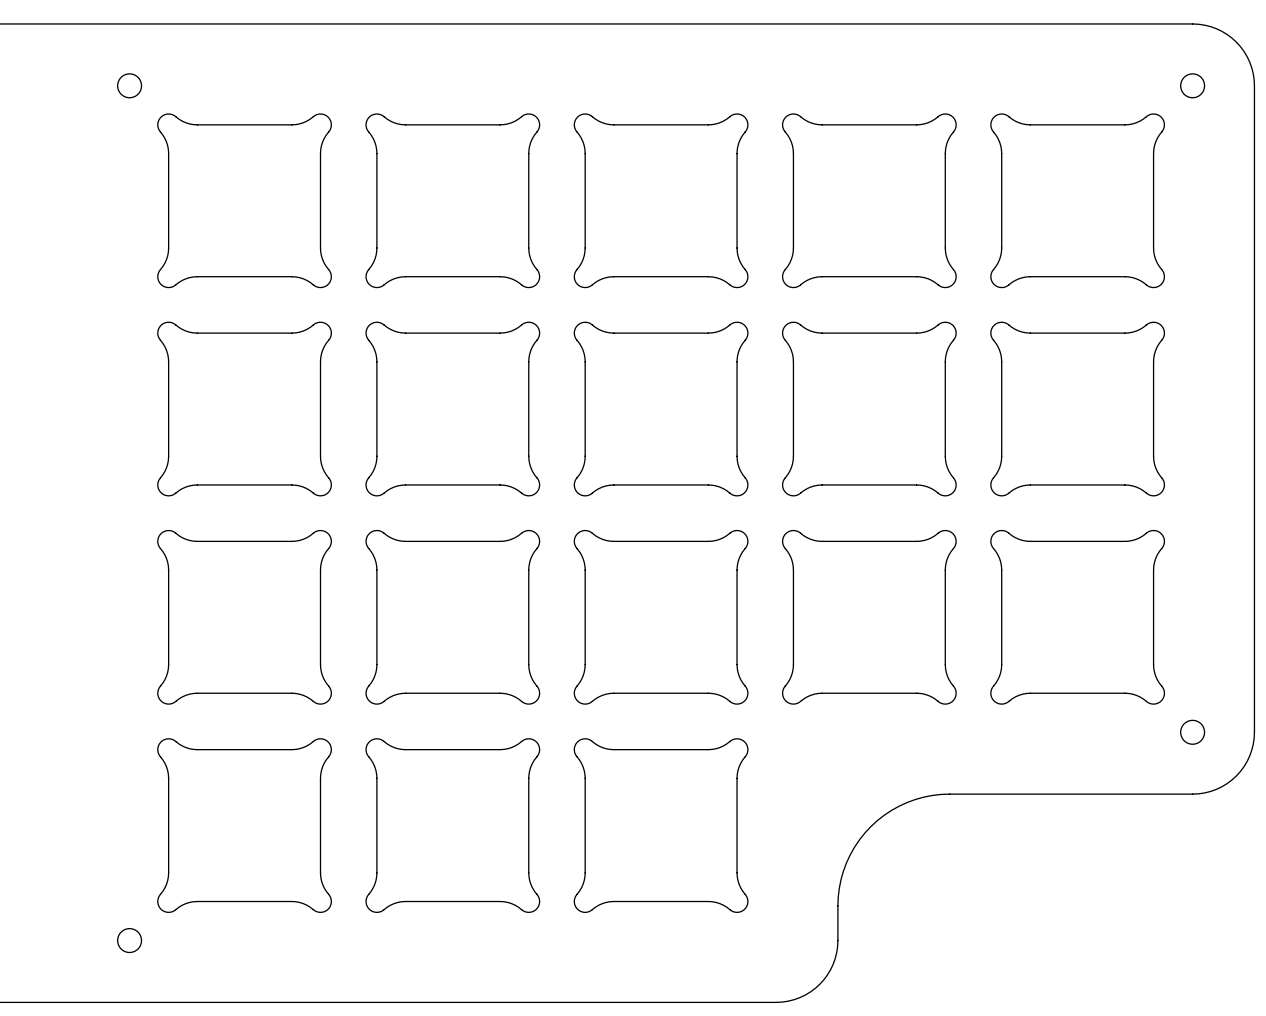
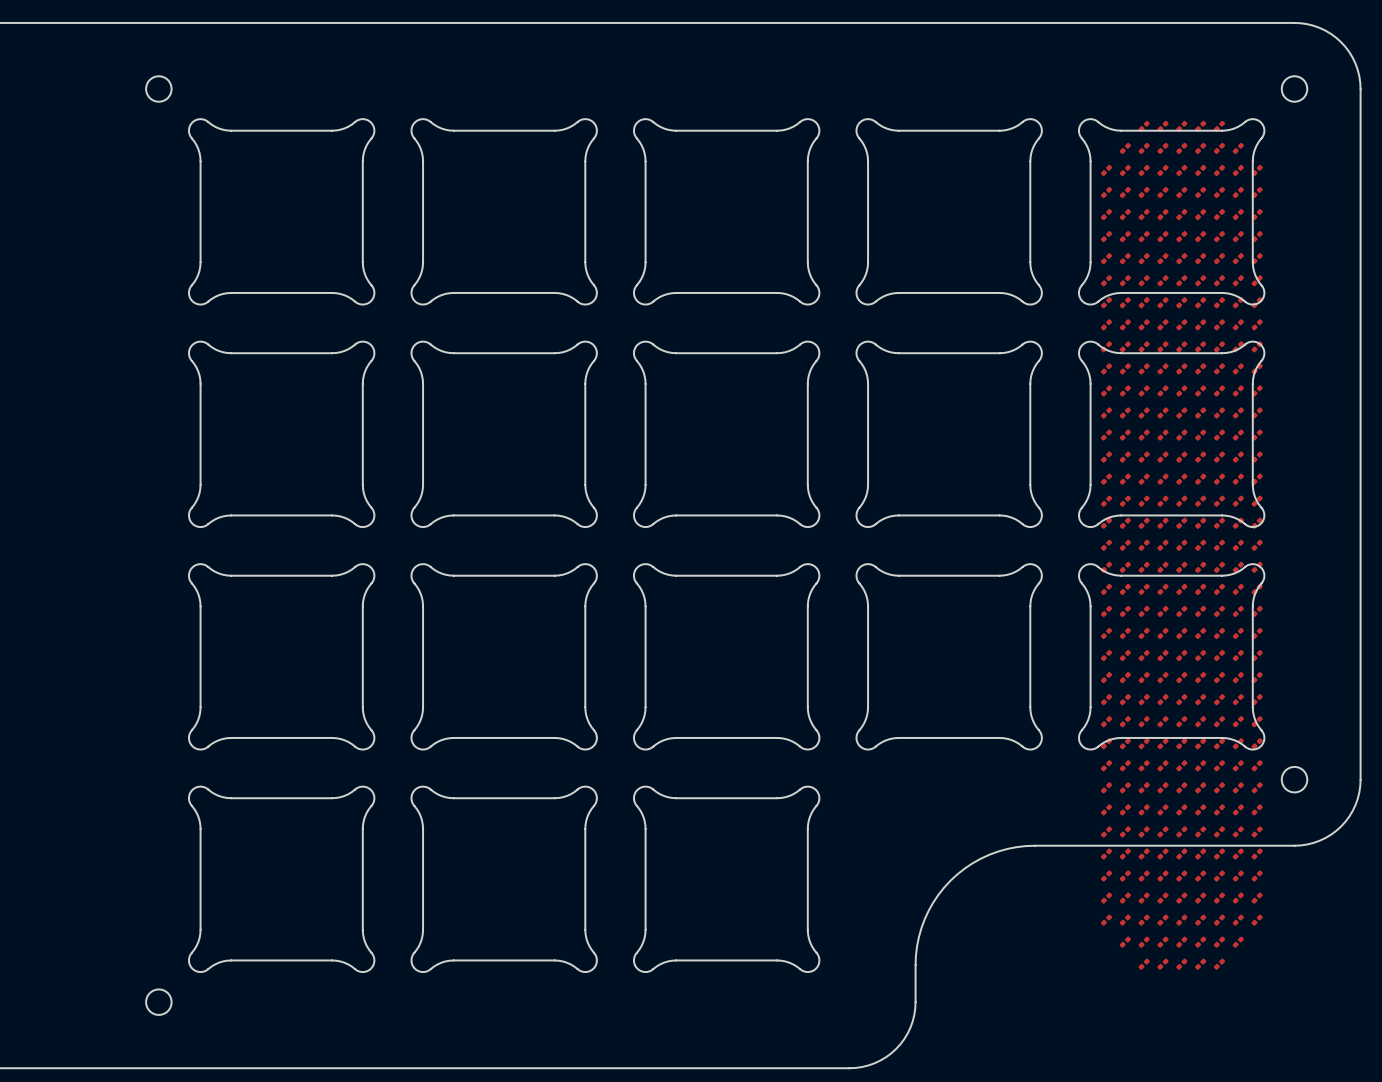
part: none -> (1144, 126)
part: none -> (1162, 126)
part: none -> (1181, 126)
part: none -> (1200, 126)
part: none -> (1219, 126)
part: none -> (1125, 148)
part: none -> (1144, 148)
part: none -> (1162, 148)
part: none -> (1181, 148)
part: none -> (1200, 148)
part: none -> (1219, 148)
part: none -> (1238, 148)
part: none -> (1106, 170)
part: none -> (1125, 170)
part: none -> (1144, 170)
part: none -> (1162, 170)
part: none -> (1181, 170)
part: none -> (1200, 170)
part: none -> (1219, 170)
part: none -> (1238, 170)
part: none -> (1257, 170)
part: none -> (1106, 192)
part: none -> (1125, 192)
part: none -> (1144, 192)
part: none -> (1162, 192)
part: none -> (1181, 192)
part: none -> (1200, 192)
part: none -> (1219, 192)
part: none -> (1238, 192)
part: none -> (1257, 192)
part: none -> (1106, 214)
part: none -> (1125, 214)
part: none -> (1144, 214)
part: none -> (1162, 214)
part: none -> (1181, 214)
part: none -> (1200, 214)
part: none -> (1219, 214)
part: none -> (1238, 214)
part: none -> (1257, 214)
part: none -> (1106, 236)
part: none -> (1125, 236)
part: none -> (1144, 236)
part: none -> (1162, 236)
part: none -> (1181, 236)
part: none -> (1200, 236)
part: none -> (1219, 236)
part: none -> (1238, 236)
part: none -> (1257, 236)
part: none -> (1106, 258)
part: none -> (1125, 258)
part: none -> (1144, 258)
part: none -> (1162, 258)
part: none -> (1181, 258)
part: none -> (1200, 258)
part: none -> (1219, 258)
part: none -> (1238, 258)
part: none -> (1257, 258)
part: none -> (1106, 280)
part: none -> (1125, 280)
part: none -> (1144, 280)
part: none -> (1162, 280)
part: none -> (1181, 280)
part: none -> (1200, 280)
part: none -> (1219, 280)
part: none -> (1238, 280)
part: none -> (1257, 280)
part: none -> (1106, 302)
part: none -> (1125, 302)
part: none -> (1144, 302)
part: none -> (1162, 302)
part: none -> (1181, 302)
part: none -> (1200, 302)
part: none -> (1219, 302)
part: none -> (1238, 302)
part: none -> (1257, 302)
part: none -> (1106, 324)
part: none -> (1125, 324)
part: none -> (1144, 324)
part: none -> (1162, 324)
part: none -> (1181, 324)
part: none -> (1200, 324)
part: none -> (1219, 324)
part: none -> (1238, 324)
part: none -> (1257, 324)
part: none -> (1106, 346)
part: none -> (1125, 346)
part: none -> (1144, 346)
part: none -> (1162, 346)
part: none -> (1181, 346)
part: none -> (1200, 346)
part: none -> (1219, 346)
part: none -> (1238, 346)
part: none -> (1257, 346)
part: none -> (1106, 368)
part: none -> (1125, 368)
part: none -> (1144, 368)
part: none -> (1162, 368)
part: none -> (1181, 368)
part: none -> (1200, 368)
part: none -> (1219, 368)
part: none -> (1238, 368)
part: none -> (1257, 368)
part: none -> (1106, 390)
part: none -> (1125, 390)
part: none -> (1144, 390)
part: none -> (1162, 390)
part: none -> (1181, 390)
part: none -> (1200, 390)
part: none -> (1219, 390)
part: none -> (1238, 390)
part: none -> (1257, 390)
part: none -> (1106, 413)
part: none -> (1125, 413)
part: none -> (1144, 413)
part: none -> (1162, 413)
part: none -> (1181, 413)
part: none -> (1200, 413)
part: none -> (1219, 413)
part: none -> (1238, 413)
part: none -> (1257, 413)
part: none -> (1106, 435)
part: none -> (1125, 435)
part: none -> (1144, 435)
part: none -> (1162, 435)
part: none -> (1181, 435)
part: none -> (1200, 435)
part: none -> (1219, 435)
part: none -> (1238, 435)
part: none -> (1257, 435)
part: none -> (1106, 457)
part: none -> (1125, 457)
part: none -> (1144, 457)
part: none -> (1162, 457)
part: none -> (1181, 457)
part: none -> (1200, 457)
part: none -> (1219, 457)
part: none -> (1238, 457)
part: none -> (1257, 457)
part: none -> (1106, 479)
part: none -> (1125, 479)
part: none -> (1144, 479)
part: none -> (1162, 479)
part: none -> (1181, 479)
part: none -> (1200, 479)
part: none -> (1219, 479)
part: none -> (1238, 479)
part: none -> (1257, 479)
part: none -> (1106, 501)
part: none -> (1125, 501)
part: none -> (1144, 501)
part: none -> (1162, 501)
part: none -> (1181, 501)
part: none -> (1200, 501)
part: none -> (1219, 501)
part: none -> (1238, 501)
part: none -> (1257, 501)
part: none -> (1106, 523)
part: none -> (1125, 523)
part: none -> (1144, 523)
part: none -> (1162, 523)
part: none -> (1181, 523)
part: none -> (1200, 523)
part: none -> (1219, 523)
part: none -> (1238, 523)
part: none -> (1257, 523)
part: none -> (1106, 545)
part: none -> (1125, 545)
part: none -> (1144, 545)
part: none -> (1162, 545)
part: none -> (1181, 545)
part: none -> (1200, 545)
part: none -> (1219, 545)
part: none -> (1238, 545)
part: none -> (1257, 545)
part: none -> (1106, 567)
part: none -> (1125, 567)
part: none -> (1144, 567)
part: none -> (1162, 567)
part: none -> (1181, 567)
part: none -> (1200, 567)
part: none -> (1219, 567)
part: none -> (1238, 567)
part: none -> (1257, 567)
part: none -> (1106, 589)
part: none -> (1125, 589)
part: none -> (1144, 589)
part: none -> (1162, 589)
part: none -> (1181, 589)
part: none -> (1200, 589)
part: none -> (1219, 589)
part: none -> (1238, 589)
part: none -> (1257, 589)
part: none -> (1106, 611)
part: none -> (1125, 611)
part: none -> (1144, 611)
part: none -> (1162, 611)
part: none -> (1181, 611)
part: none -> (1200, 611)
part: none -> (1219, 611)
part: none -> (1238, 611)
part: none -> (1257, 611)
part: none -> (1106, 633)
part: none -> (1125, 633)
part: none -> (1144, 633)
part: none -> (1162, 633)
part: none -> (1181, 633)
part: none -> (1200, 633)
part: none -> (1219, 633)
part: none -> (1238, 633)
part: none -> (1257, 633)
part: none -> (1106, 655)
part: none -> (1125, 655)
part: none -> (1144, 655)
part: none -> (1162, 655)
part: none -> (1181, 655)
part: none -> (1200, 655)
part: none -> (1219, 655)
part: none -> (1238, 655)
part: none -> (1257, 655)
part: none -> (1106, 677)
part: none -> (1125, 677)
part: none -> (1144, 677)
part: none -> (1162, 677)
part: none -> (1181, 677)
part: none -> (1200, 677)
part: none -> (1219, 677)
part: none -> (1238, 677)
part: none -> (1257, 677)
part: none -> (1106, 699)
part: none -> (1125, 699)
part: none -> (1144, 699)
part: none -> (1162, 699)
part: none -> (1181, 699)
part: none -> (1200, 699)
part: none -> (1219, 699)
part: none -> (1238, 699)
part: none -> (1257, 699)
part: none -> (1106, 721)
part: none -> (1125, 721)
part: none -> (1144, 721)
part: none -> (1162, 721)
part: none -> (1181, 721)
part: none -> (1200, 721)
part: none -> (1219, 721)
part: none -> (1238, 721)
part: none -> (1257, 721)
part: none -> (1106, 743)
part: none -> (1125, 743)
part: none -> (1144, 743)
part: none -> (1162, 743)
part: none -> (1181, 743)
part: none -> (1200, 743)
part: none -> (1219, 743)
part: none -> (1238, 743)
part: none -> (1257, 743)
part: none -> (1106, 765)
part: none -> (1125, 765)
part: none -> (1144, 765)
part: none -> (1162, 765)
part: none -> (1181, 765)
part: none -> (1200, 765)
part: none -> (1219, 765)
part: none -> (1238, 765)
part: none -> (1257, 765)
part: none -> (1106, 787)
part: none -> (1125, 787)
part: none -> (1144, 787)
part: none -> (1162, 787)
part: none -> (1181, 787)
part: none -> (1200, 787)
part: none -> (1219, 787)
part: none -> (1238, 787)
part: none -> (1257, 787)
part: none -> (1106, 809)
part: none -> (1125, 809)
part: none -> (1144, 809)
part: none -> (1162, 809)
part: none -> (1181, 809)
part: none -> (1200, 809)
part: none -> (1219, 809)
part: none -> (1238, 809)
part: none -> (1257, 809)
part: none -> (1106, 831)
part: none -> (1125, 831)
part: none -> (1144, 831)
part: none -> (1162, 831)
part: none -> (1181, 831)
part: none -> (1200, 831)
part: none -> (1219, 831)
part: none -> (1238, 831)
part: none -> (1257, 831)
part: none -> (1106, 853)
part: none -> (1125, 853)
part: none -> (1144, 853)
part: none -> (1162, 853)
part: none -> (1181, 853)
part: none -> (1200, 853)
part: none -> (1219, 853)
part: none -> (1238, 853)
part: none -> (1257, 853)
part: none -> (1106, 876)
part: none -> (1125, 876)
part: none -> (1144, 876)
part: none -> (1162, 876)
part: none -> (1181, 876)
part: none -> (1200, 876)
part: none -> (1219, 876)
part: none -> (1238, 876)
part: none -> (1257, 876)
part: none -> (1106, 898)
part: none -> (1125, 898)
part: none -> (1144, 898)
part: none -> (1162, 898)
part: none -> (1181, 898)
part: none -> (1200, 898)
part: none -> (1219, 898)
part: none -> (1238, 898)
part: none -> (1257, 898)
part: none -> (1106, 920)
part: none -> (1125, 920)
part: none -> (1144, 920)
part: none -> (1162, 920)
part: none -> (1181, 920)
part: none -> (1200, 920)
part: none -> (1219, 920)
part: none -> (1238, 920)
part: none -> (1257, 920)
part: none -> (1125, 942)
part: none -> (1144, 942)
part: none -> (1162, 942)
part: none -> (1181, 942)
part: none -> (1200, 942)
part: none -> (1219, 942)
part: none -> (1238, 942)
part: none -> (1144, 964)
part: none -> (1162, 964)
part: none -> (1181, 964)
part: none -> (1200, 964)
part: none -> (1219, 964)

